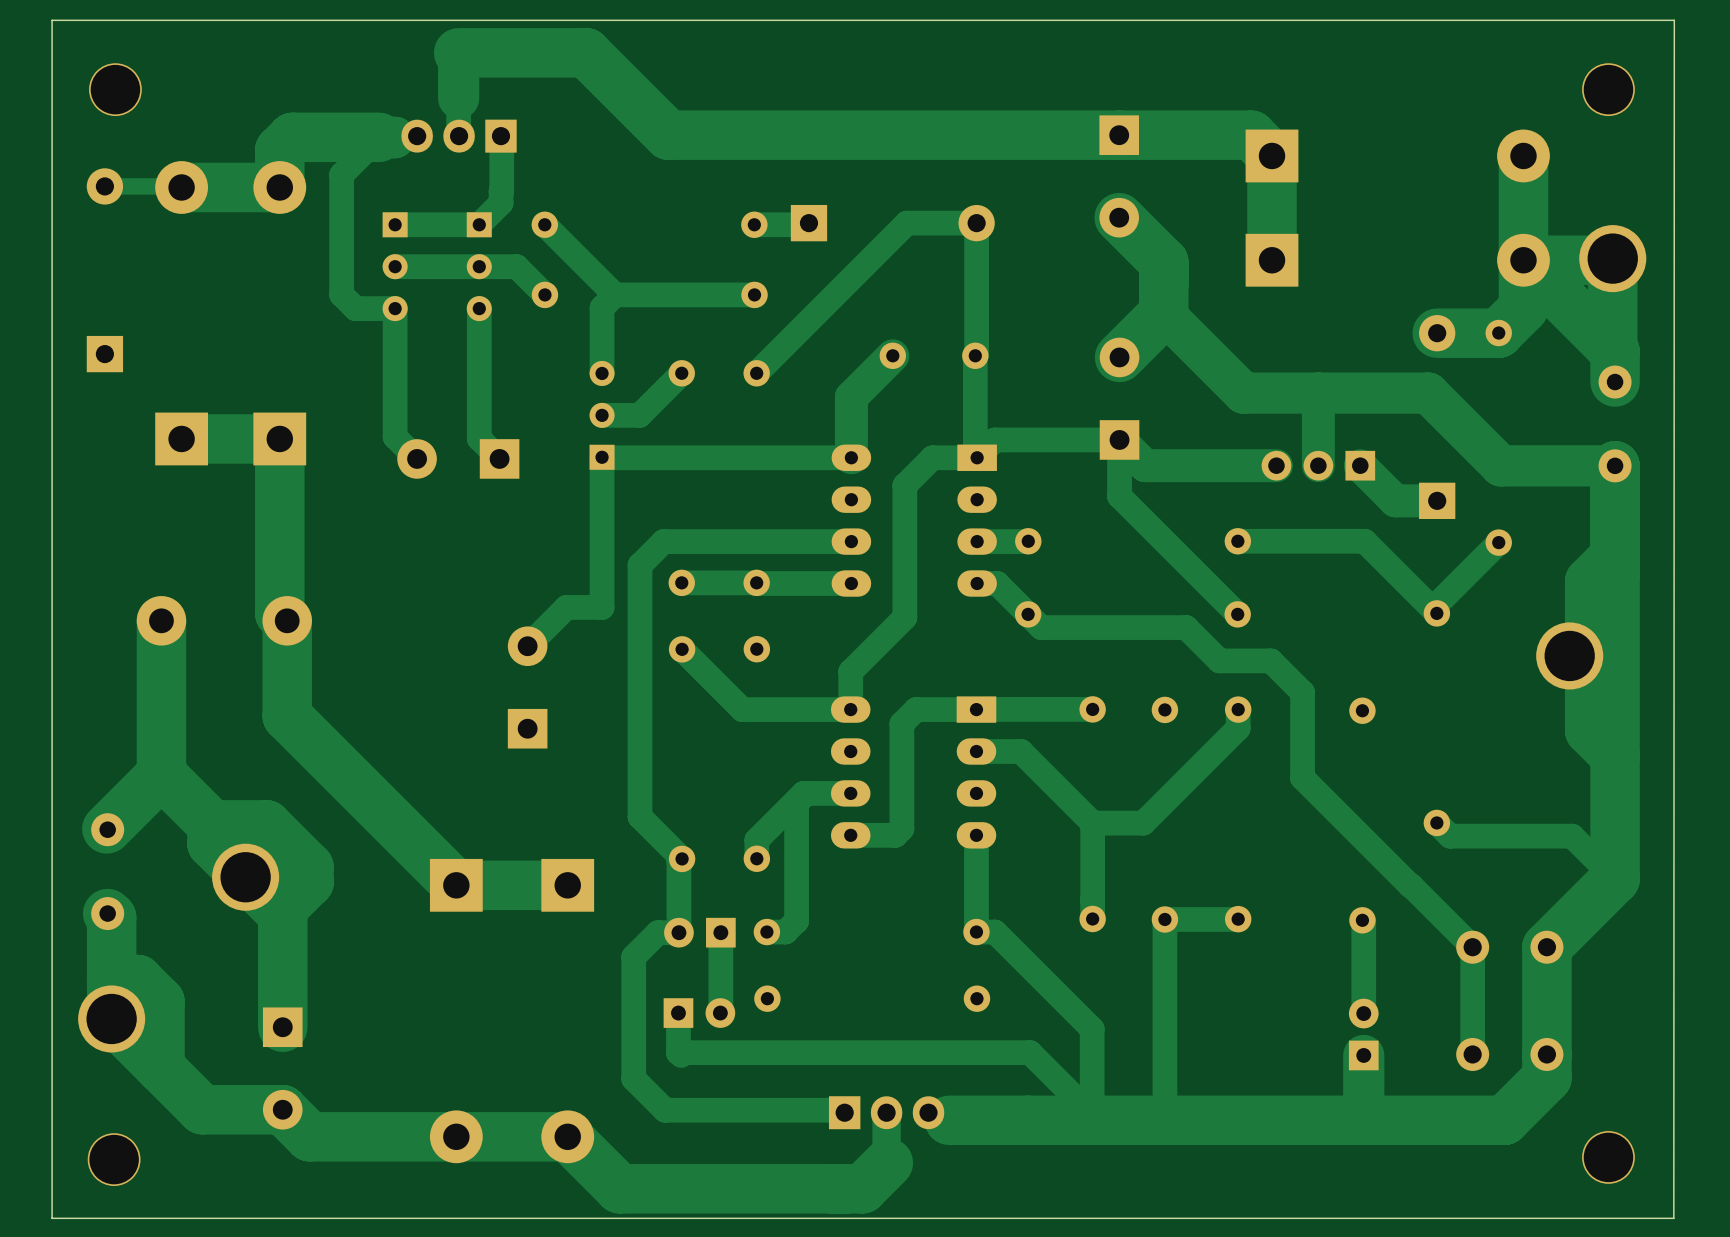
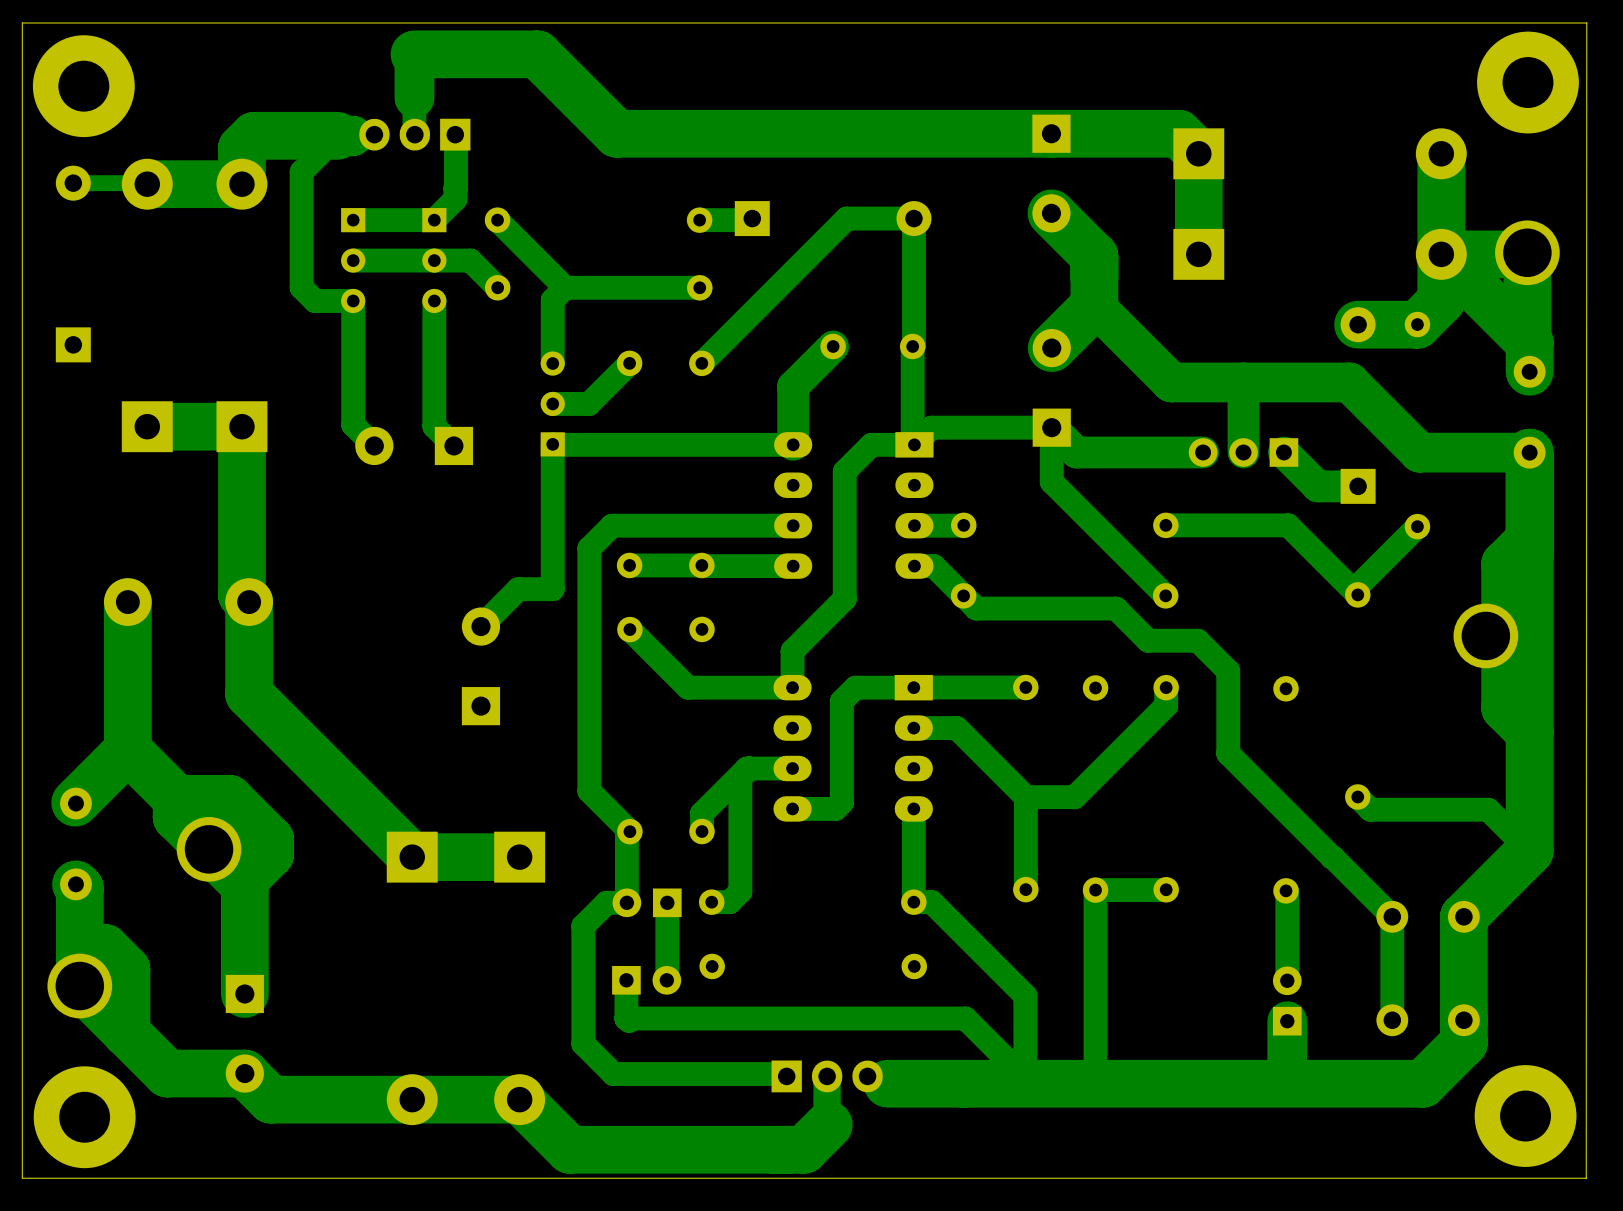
part footprint: [89, 63, 142, 117] -> [32, 35, 135, 138]
part footprint: [1582, 63, 1635, 117] -> [1477, 31, 1579, 134]
part footprint: [1582, 1131, 1635, 1184] -> [1474, 1065, 1577, 1167]
part footprint: [87, 1133, 141, 1186] -> [33, 1066, 136, 1169]

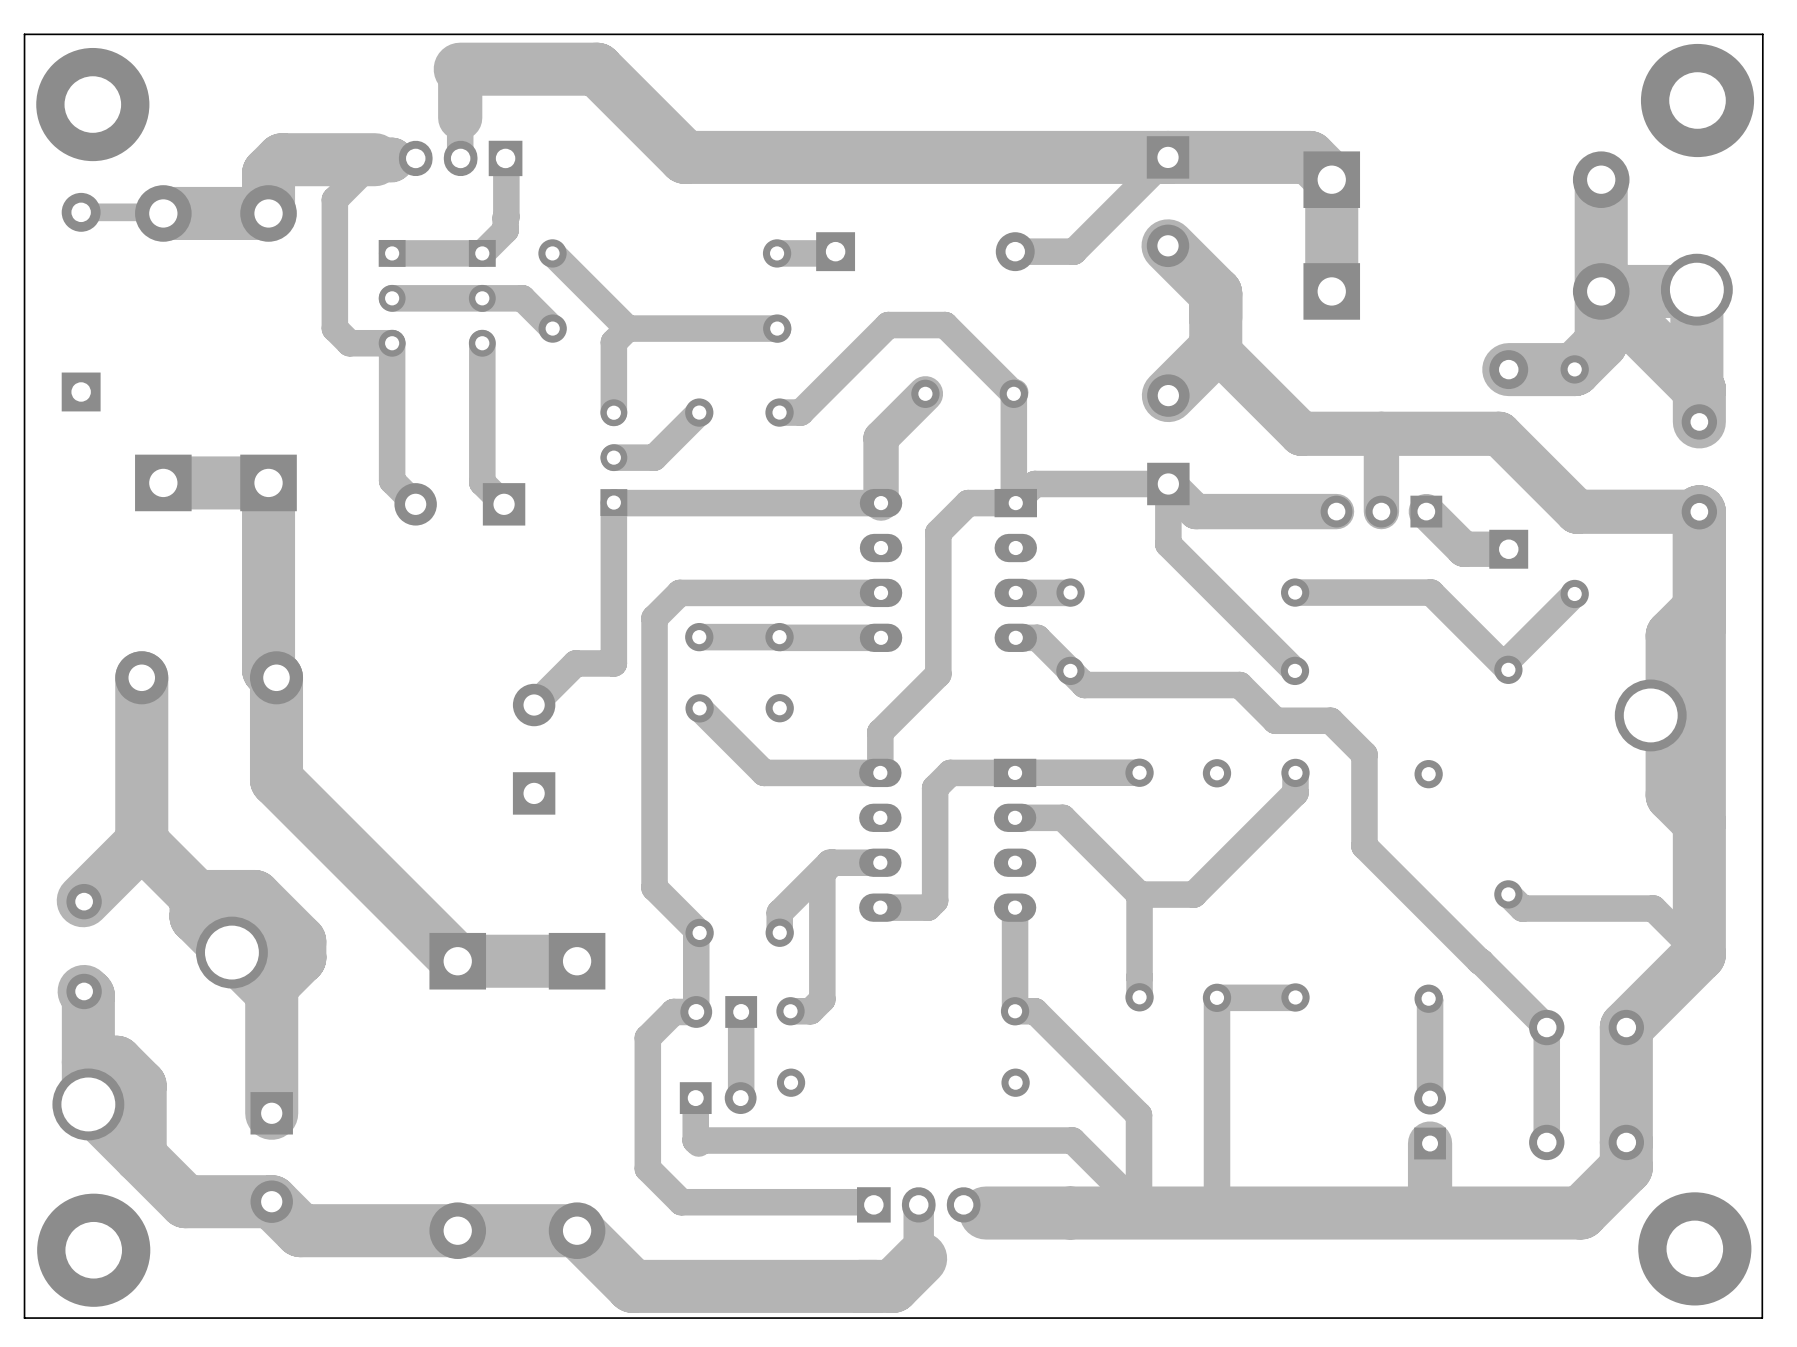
track: none -> (1168, 157) (1073, 251) (1015, 251)
track: (913, 345) (913, 218) (846, 218) (701, 363) -> (1013, 393) (945, 325) (888, 325) (800, 412) (779, 412)

